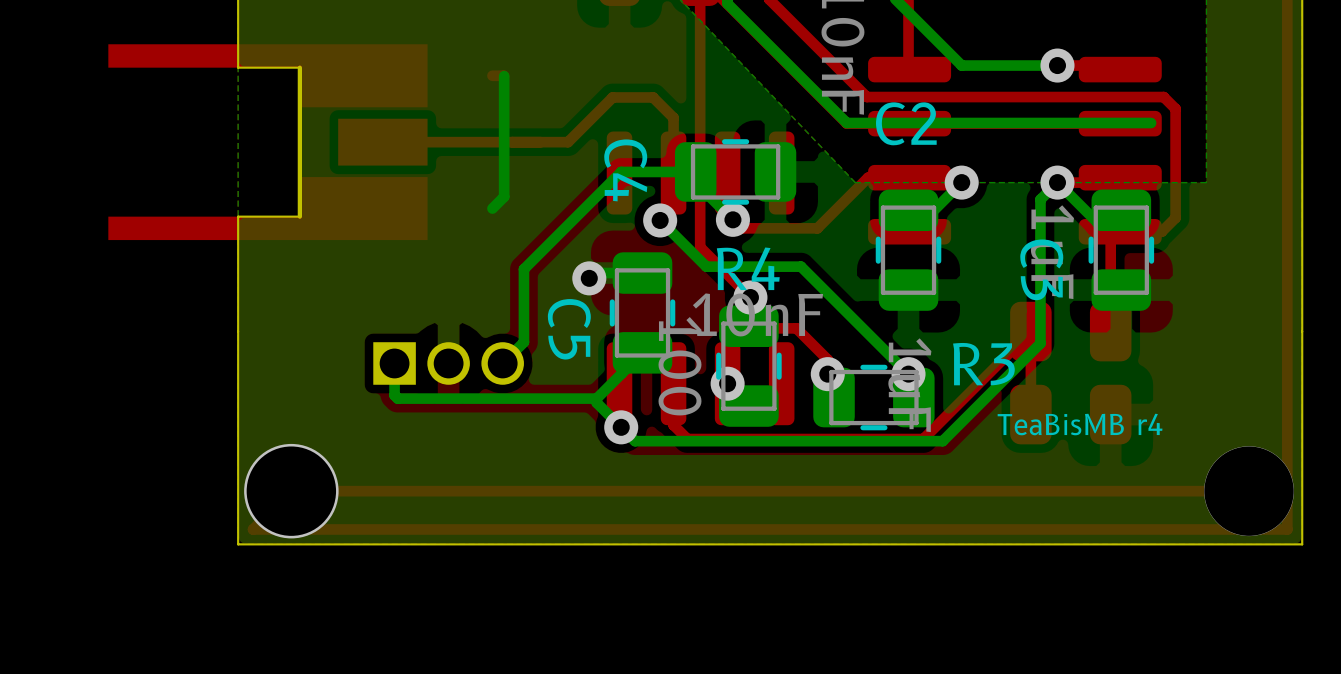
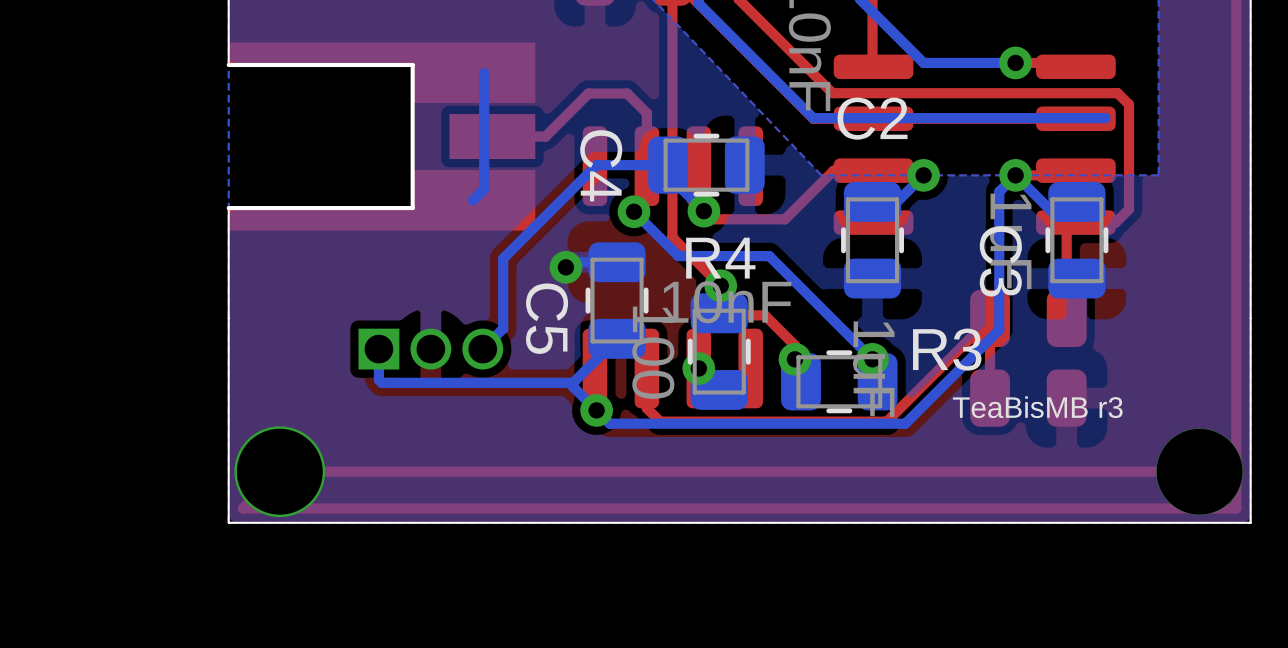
board edge: (299, 67) (238, 67) -> none
part: (267, 142) -> none
part: none -> (380, 136)
top track: (511, 142) (382, 142) -> none
board edge: (299, 216) (238, 216) -> none
text: TeaBisMB r4 (1080, 424) -> TeaBisMB r3 (1037, 407)

